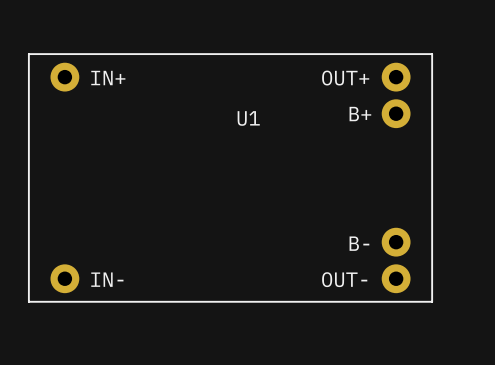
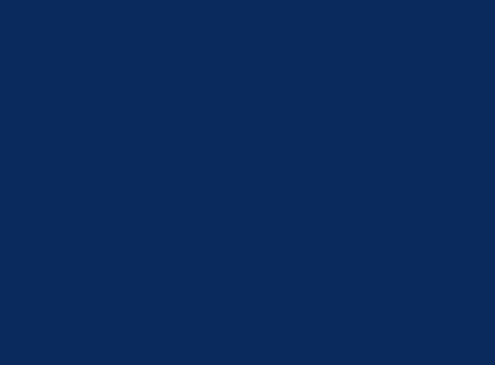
U1: (230, 177) -> none

